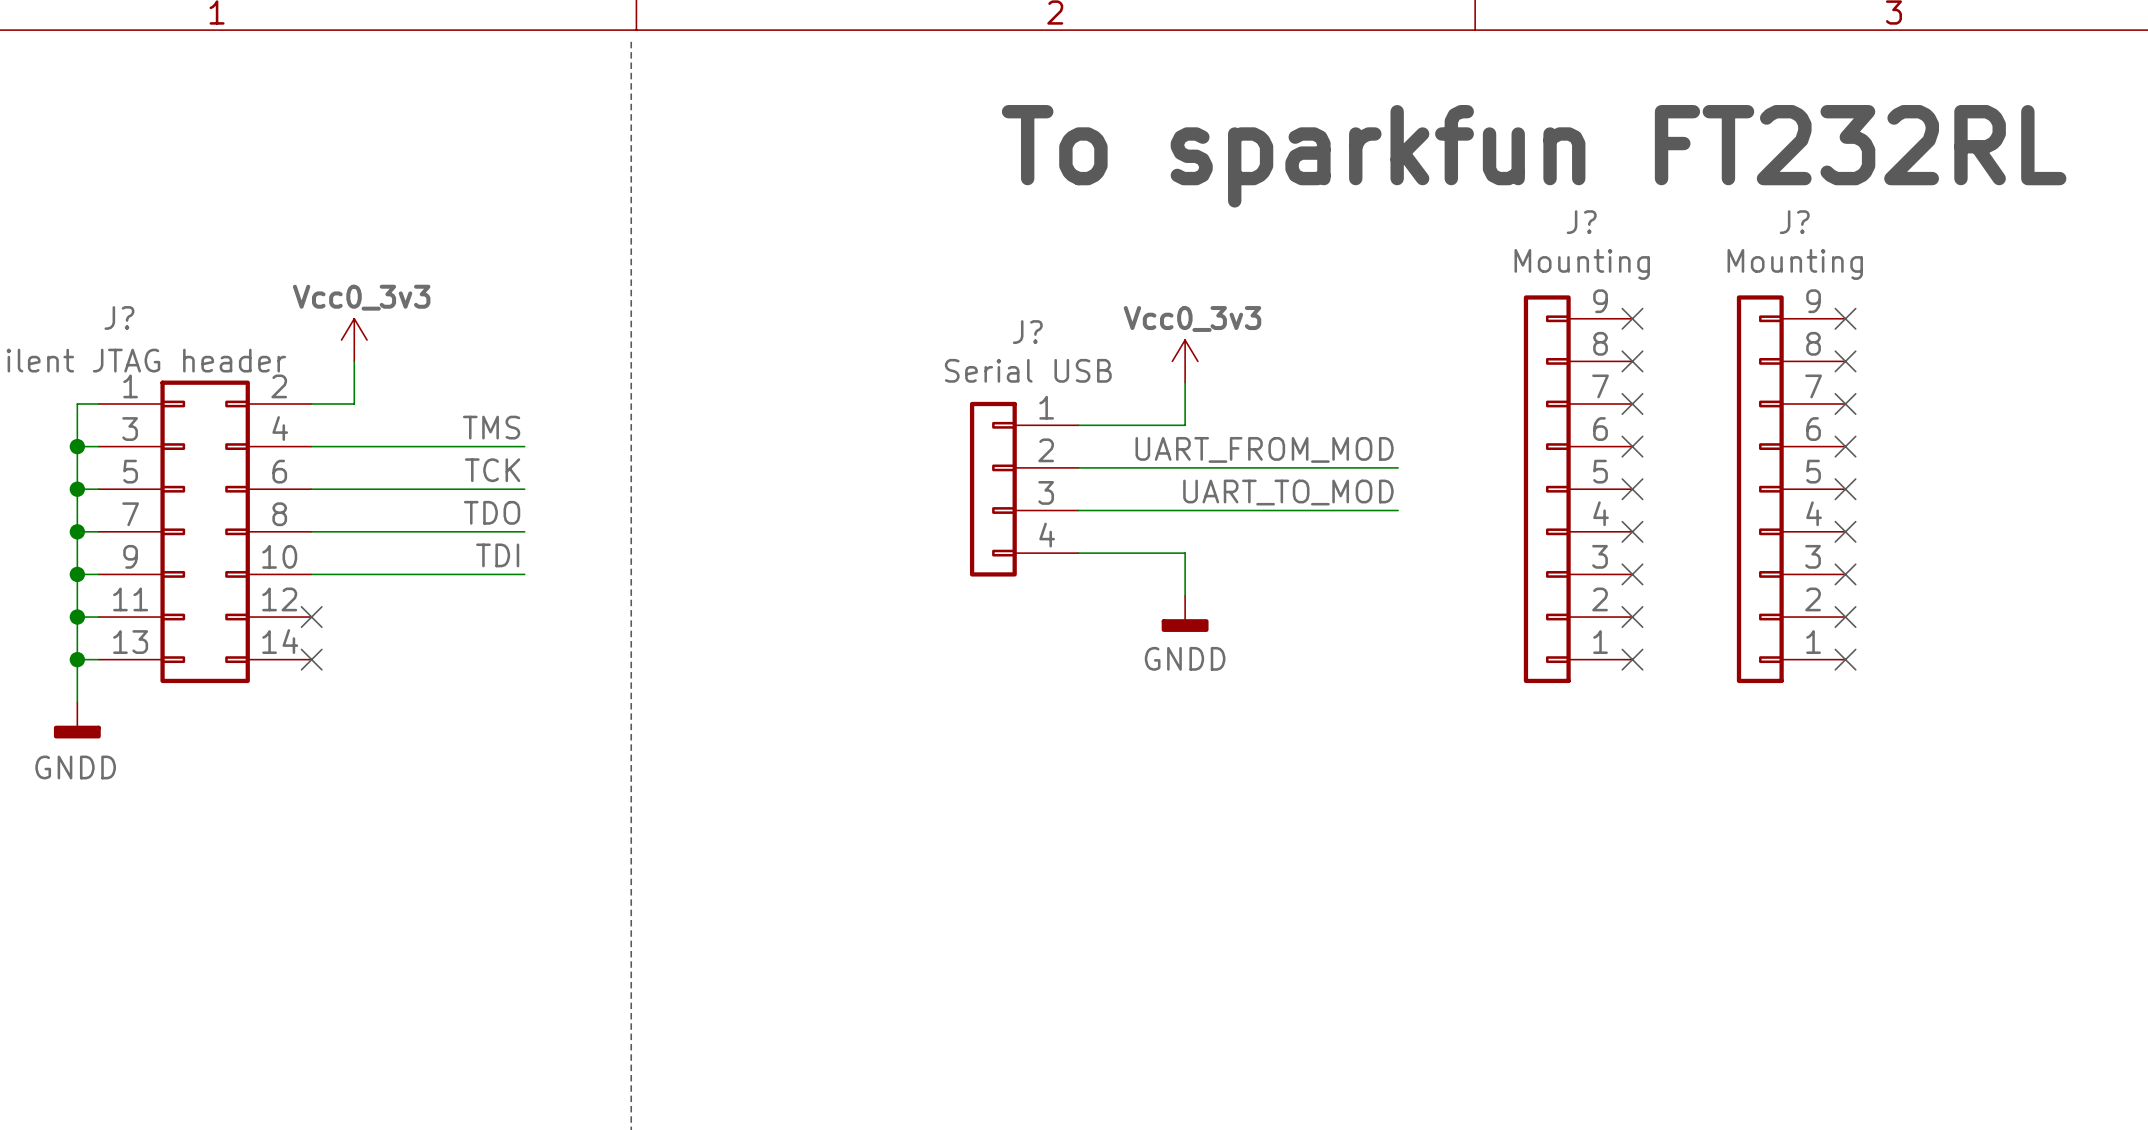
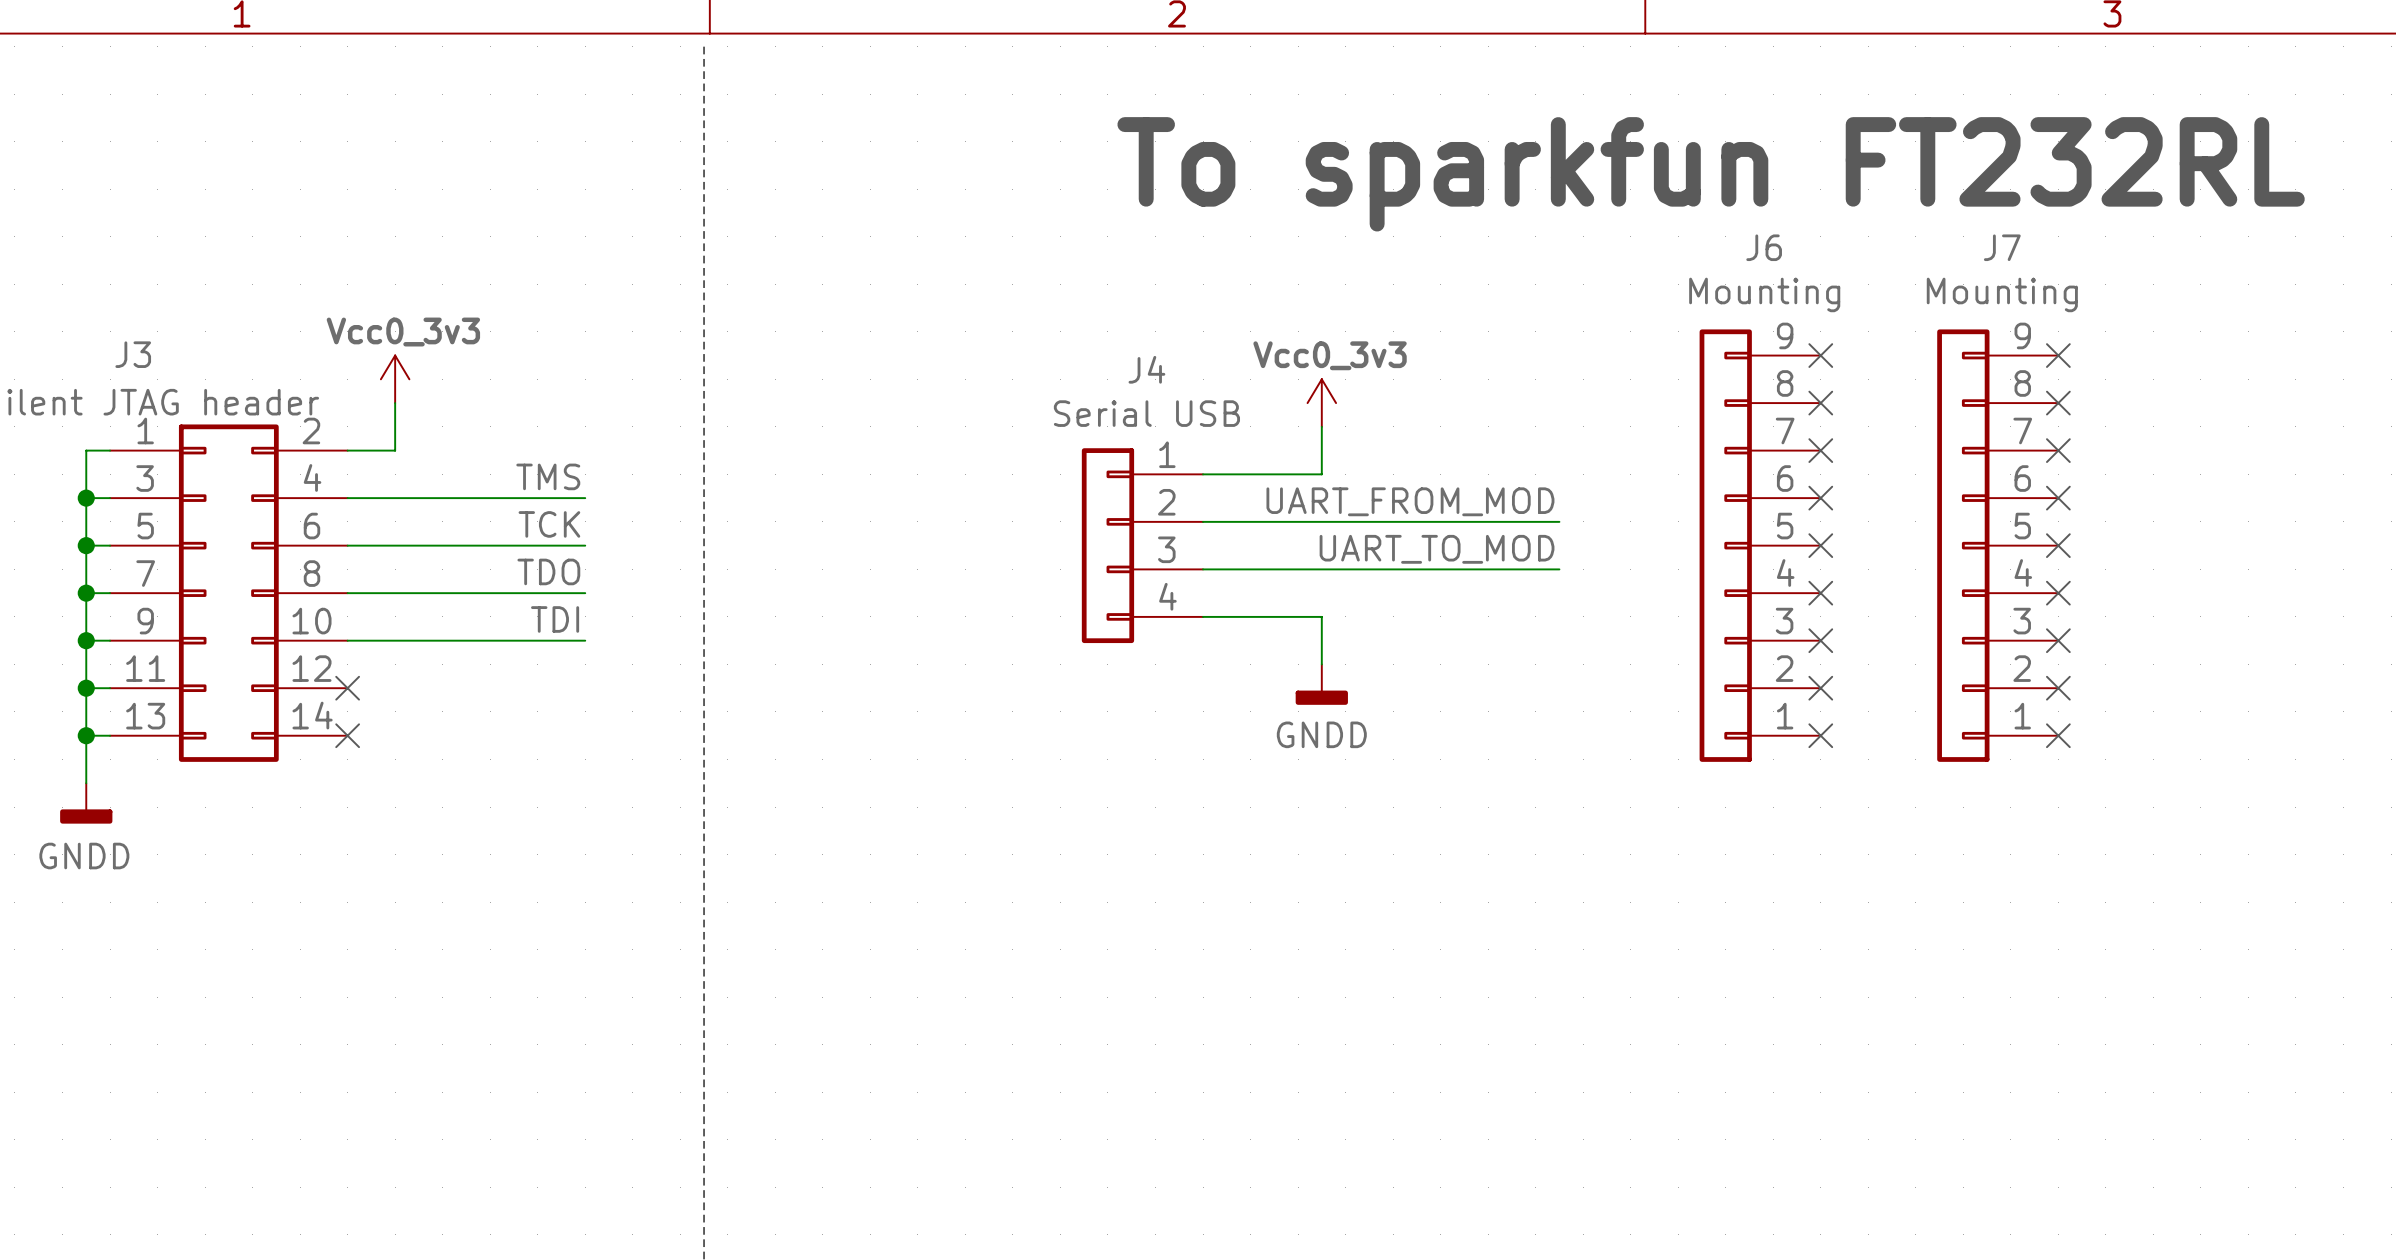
J? name: J? (1581, 222) -> J6 (1764, 247)
J? name: J? (1794, 222) -> J7 (2002, 247)
J? name: J? (119, 317) -> J3 (133, 354)
J? name: J? (1027, 332) -> J4 (1146, 369)

